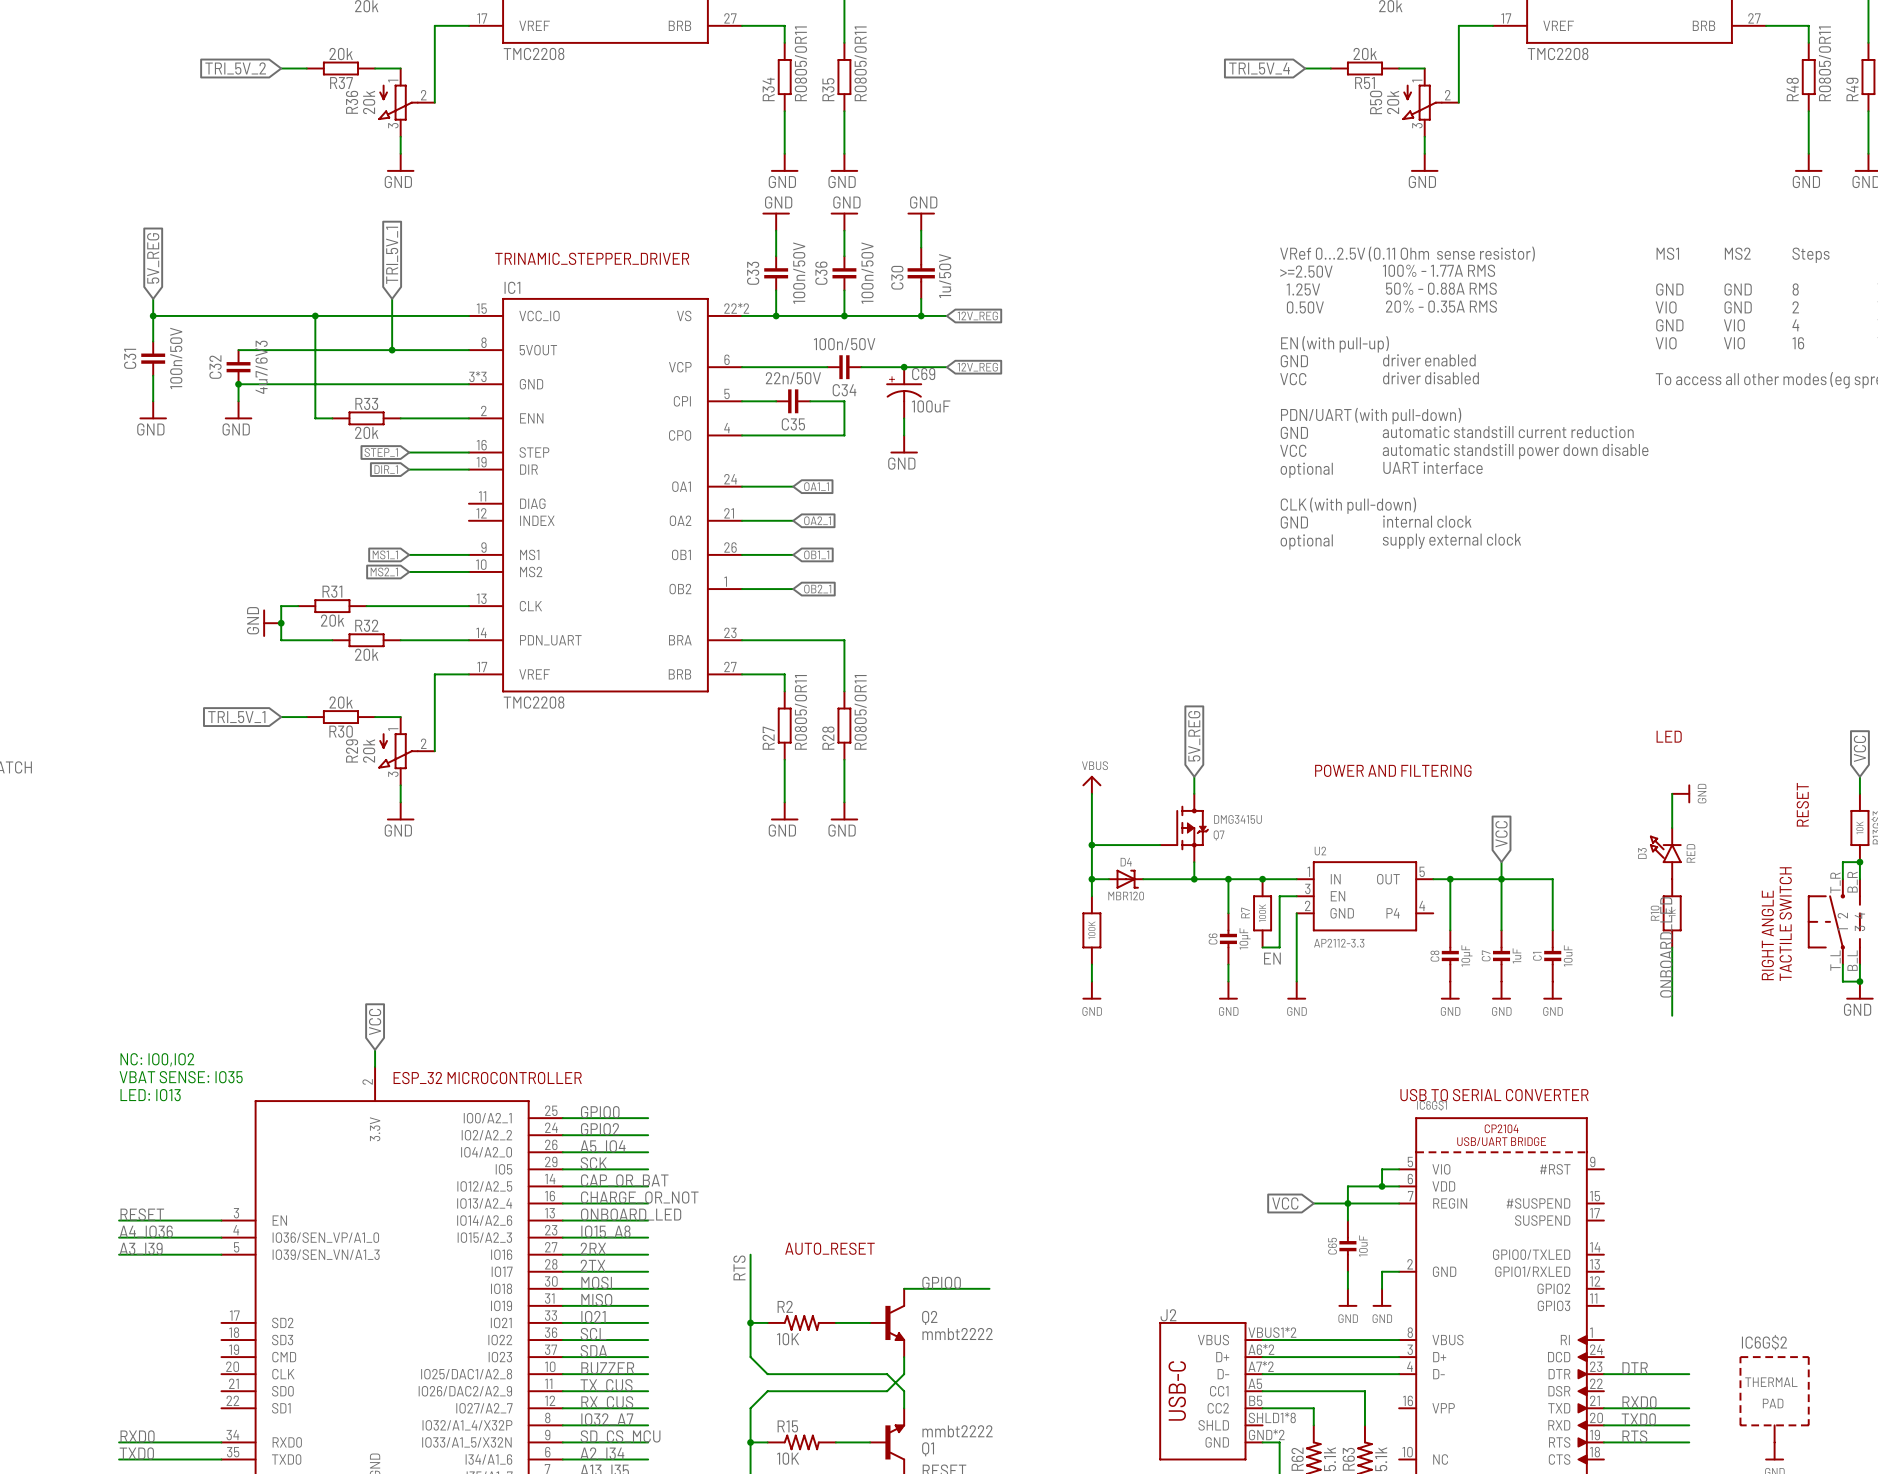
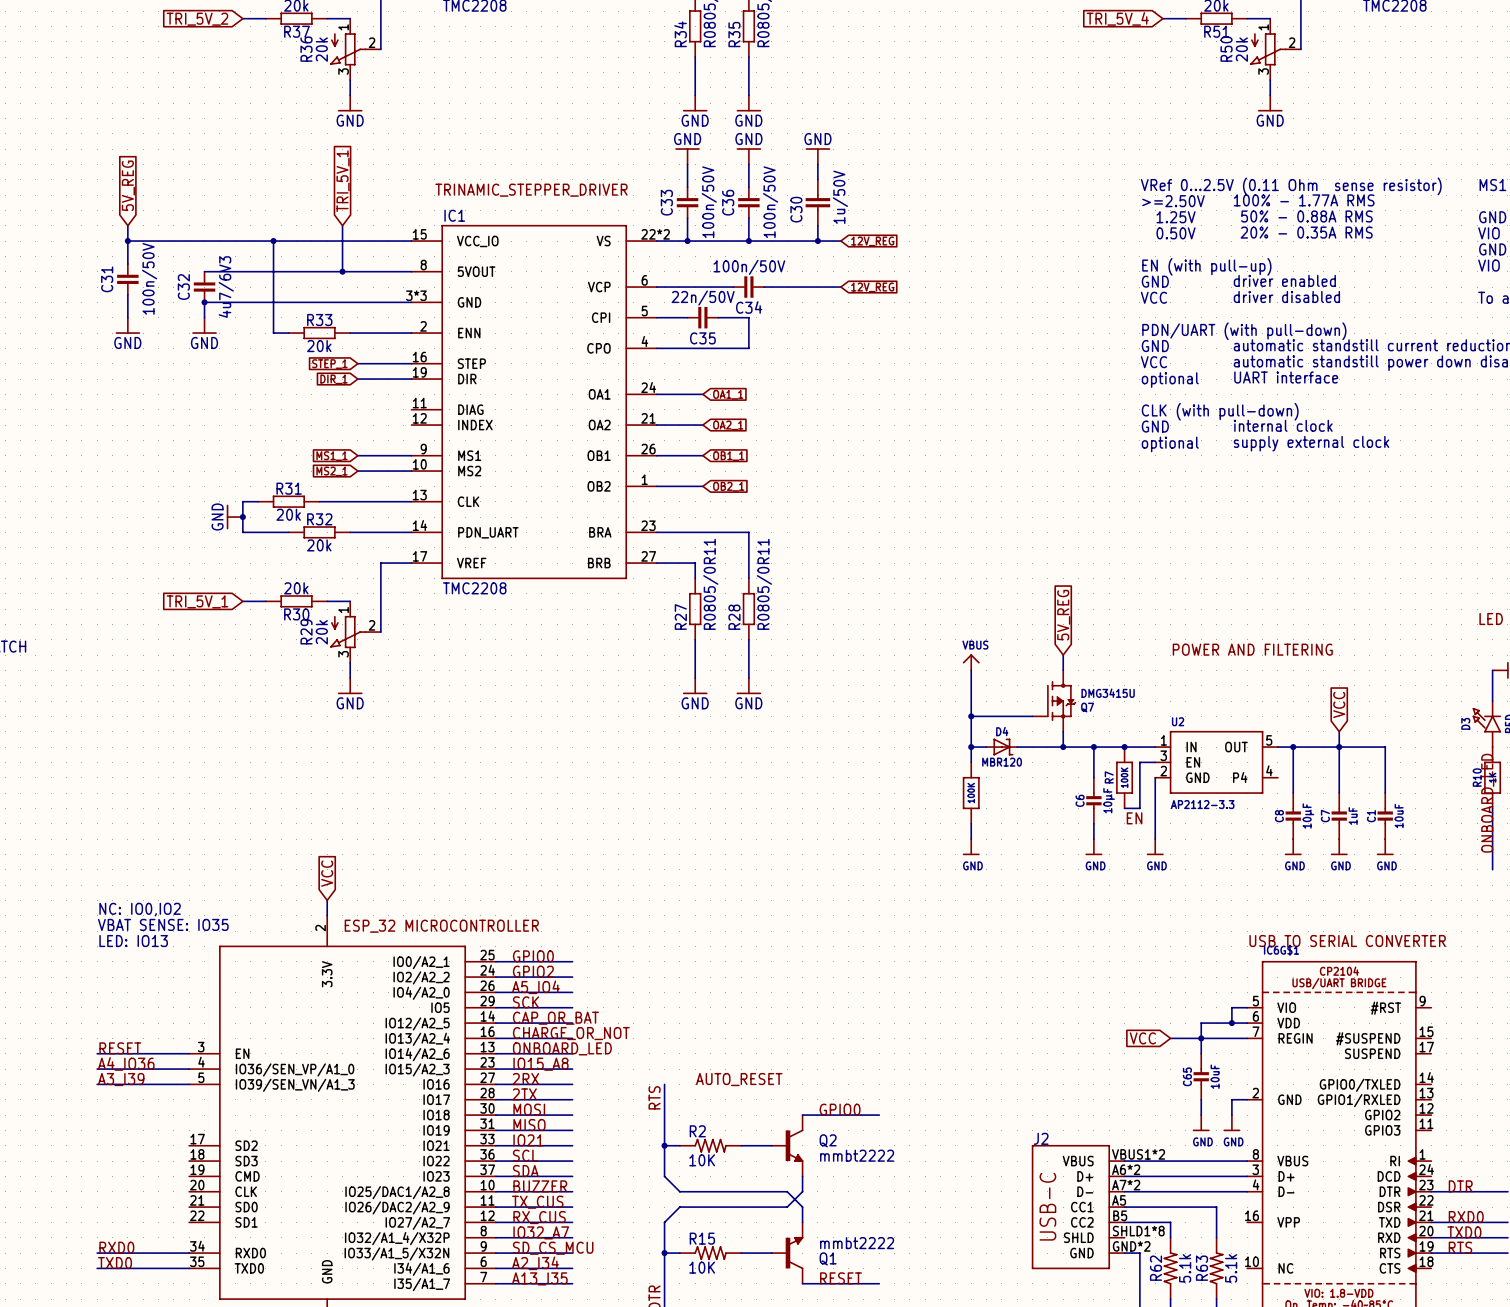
junction: (904, 367) -> none
C69: 100uF (904, 392) -> none
wire: (904, 418) (904, 435) -> none
power symbol: GND (904, 444) -> none

